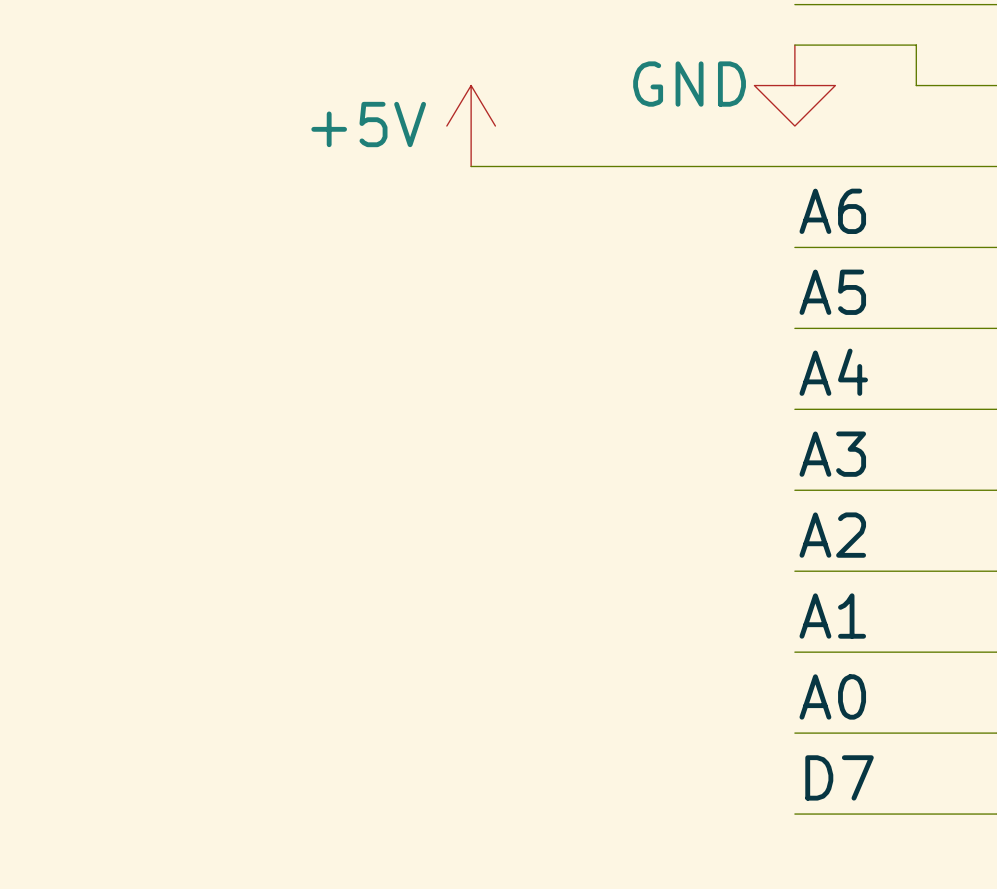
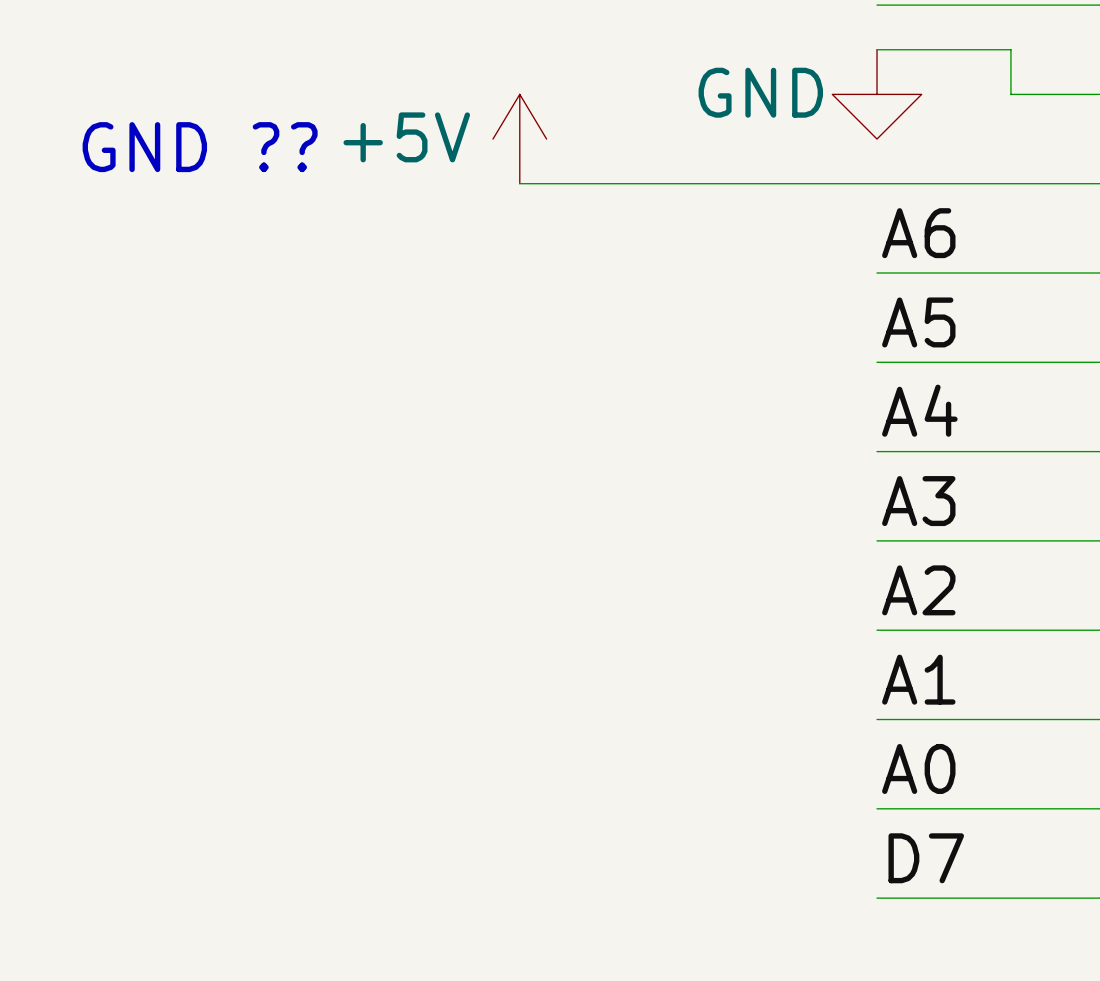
text: none -> GND ?? (200, 147)

